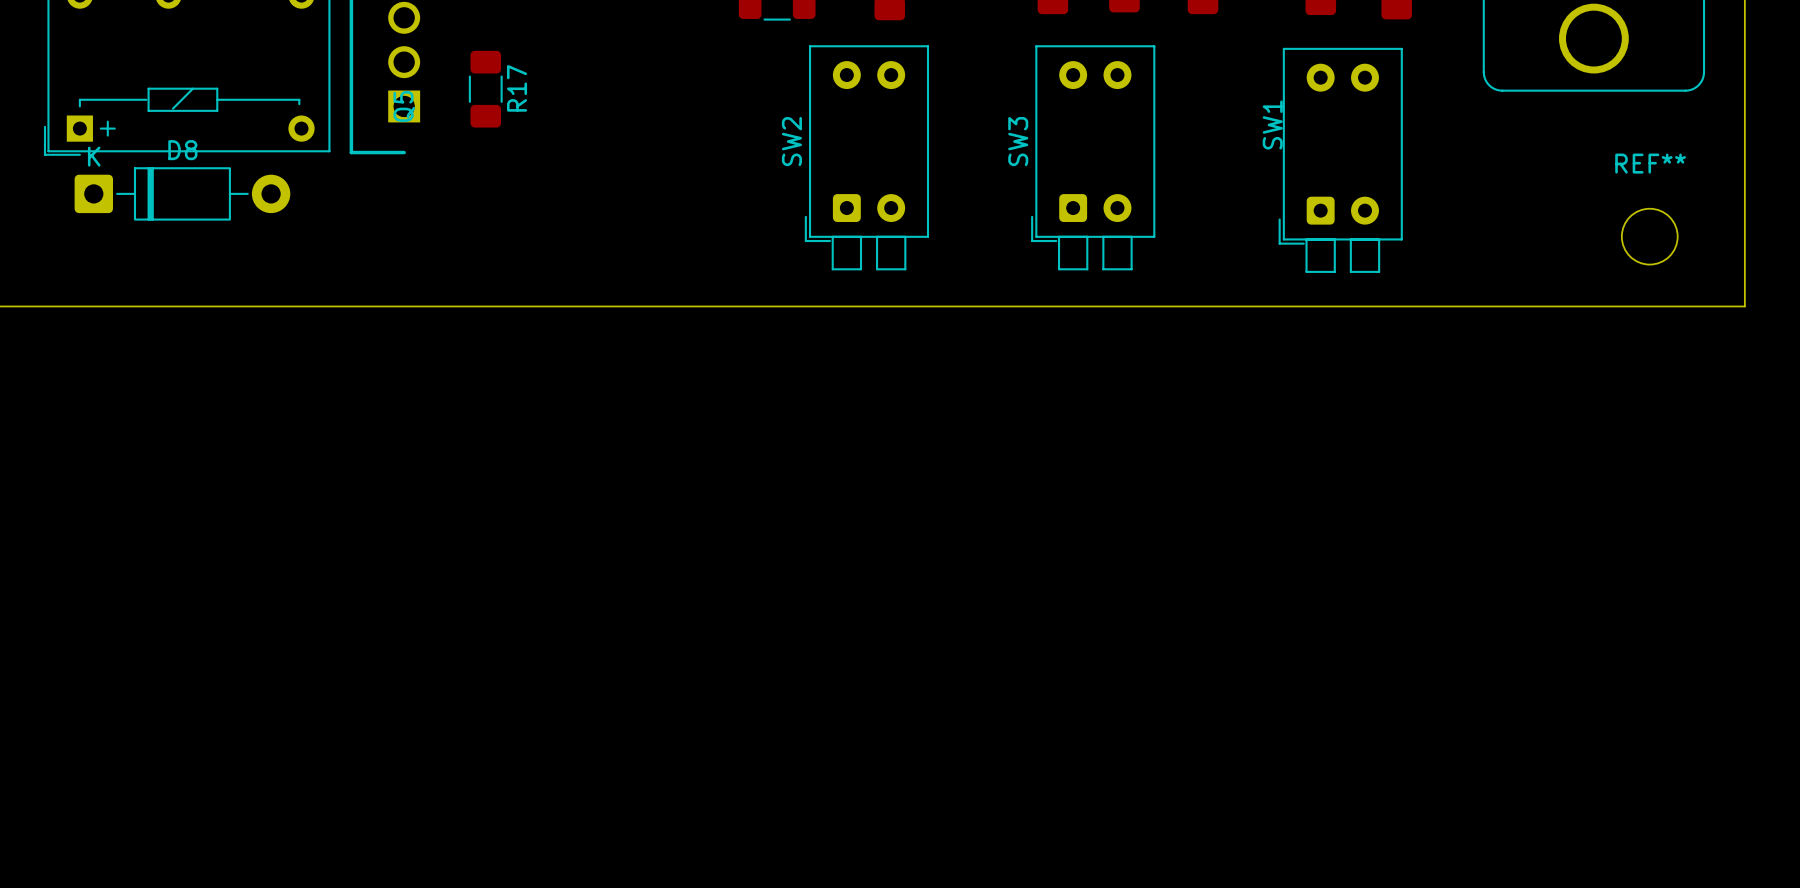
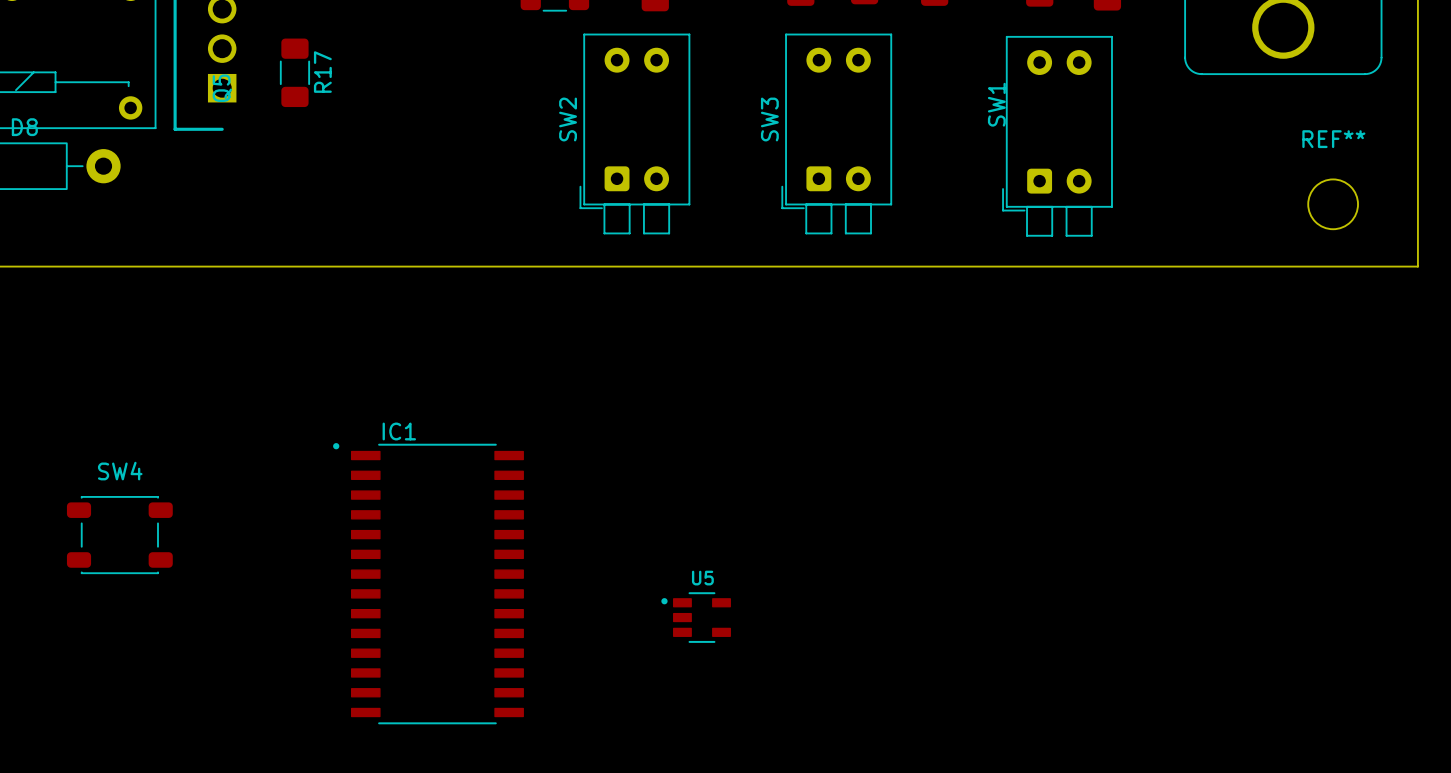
SW4: none -> (119, 535)
IC1: none -> (428, 583)
U5: none -> (696, 617)

